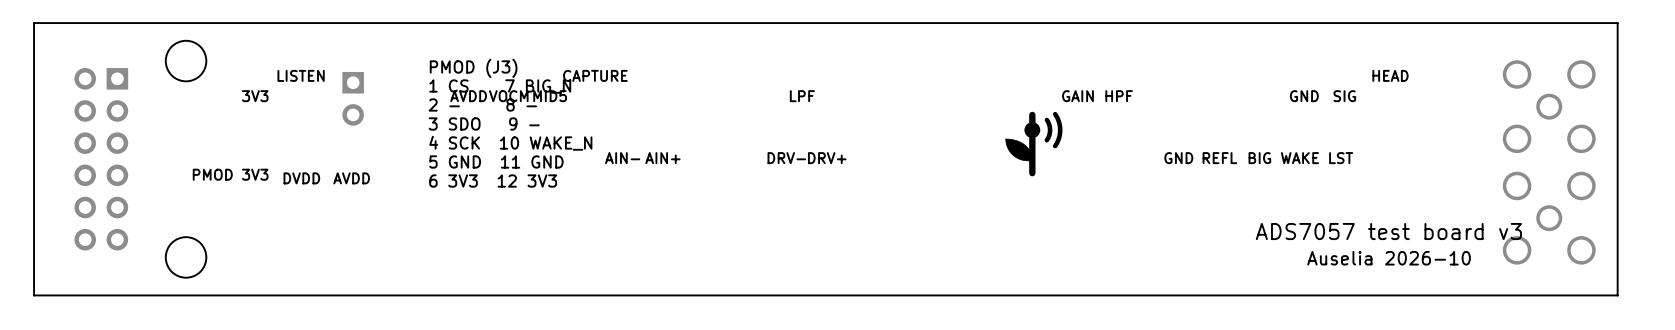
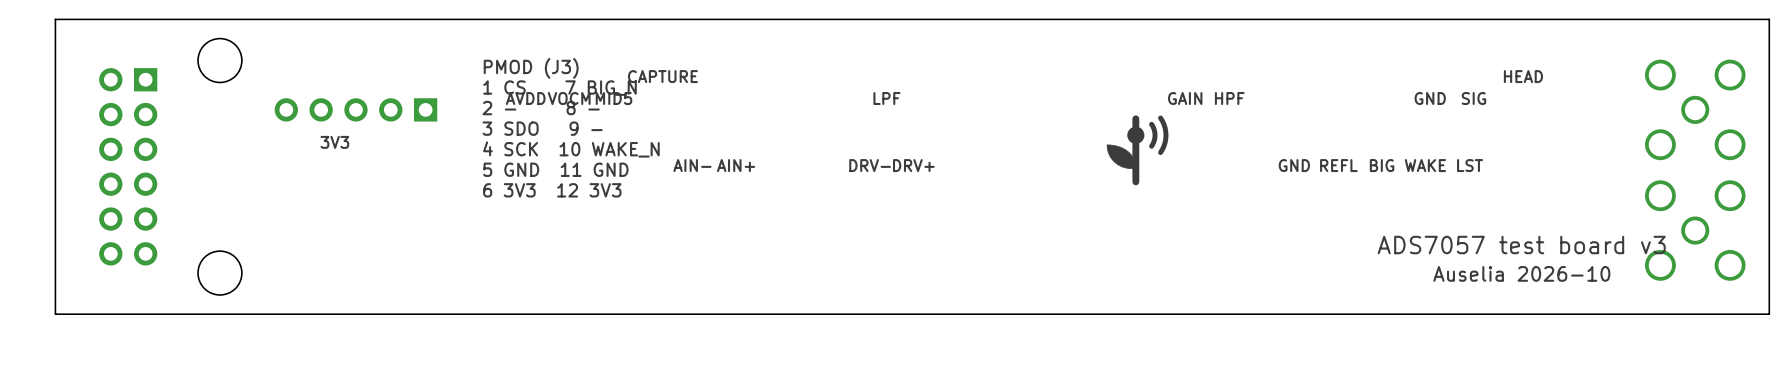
text: LISTEN (301, 75) -> none
text position: 3V3 (255, 96) -> 3V3 (334, 142)
part: (353, 98) -> none
part: none -> (355, 109)
text: PMOD 3V3 (230, 174) -> none
text: DVDD (301, 178) -> none
text: AVDD (351, 178) -> none

